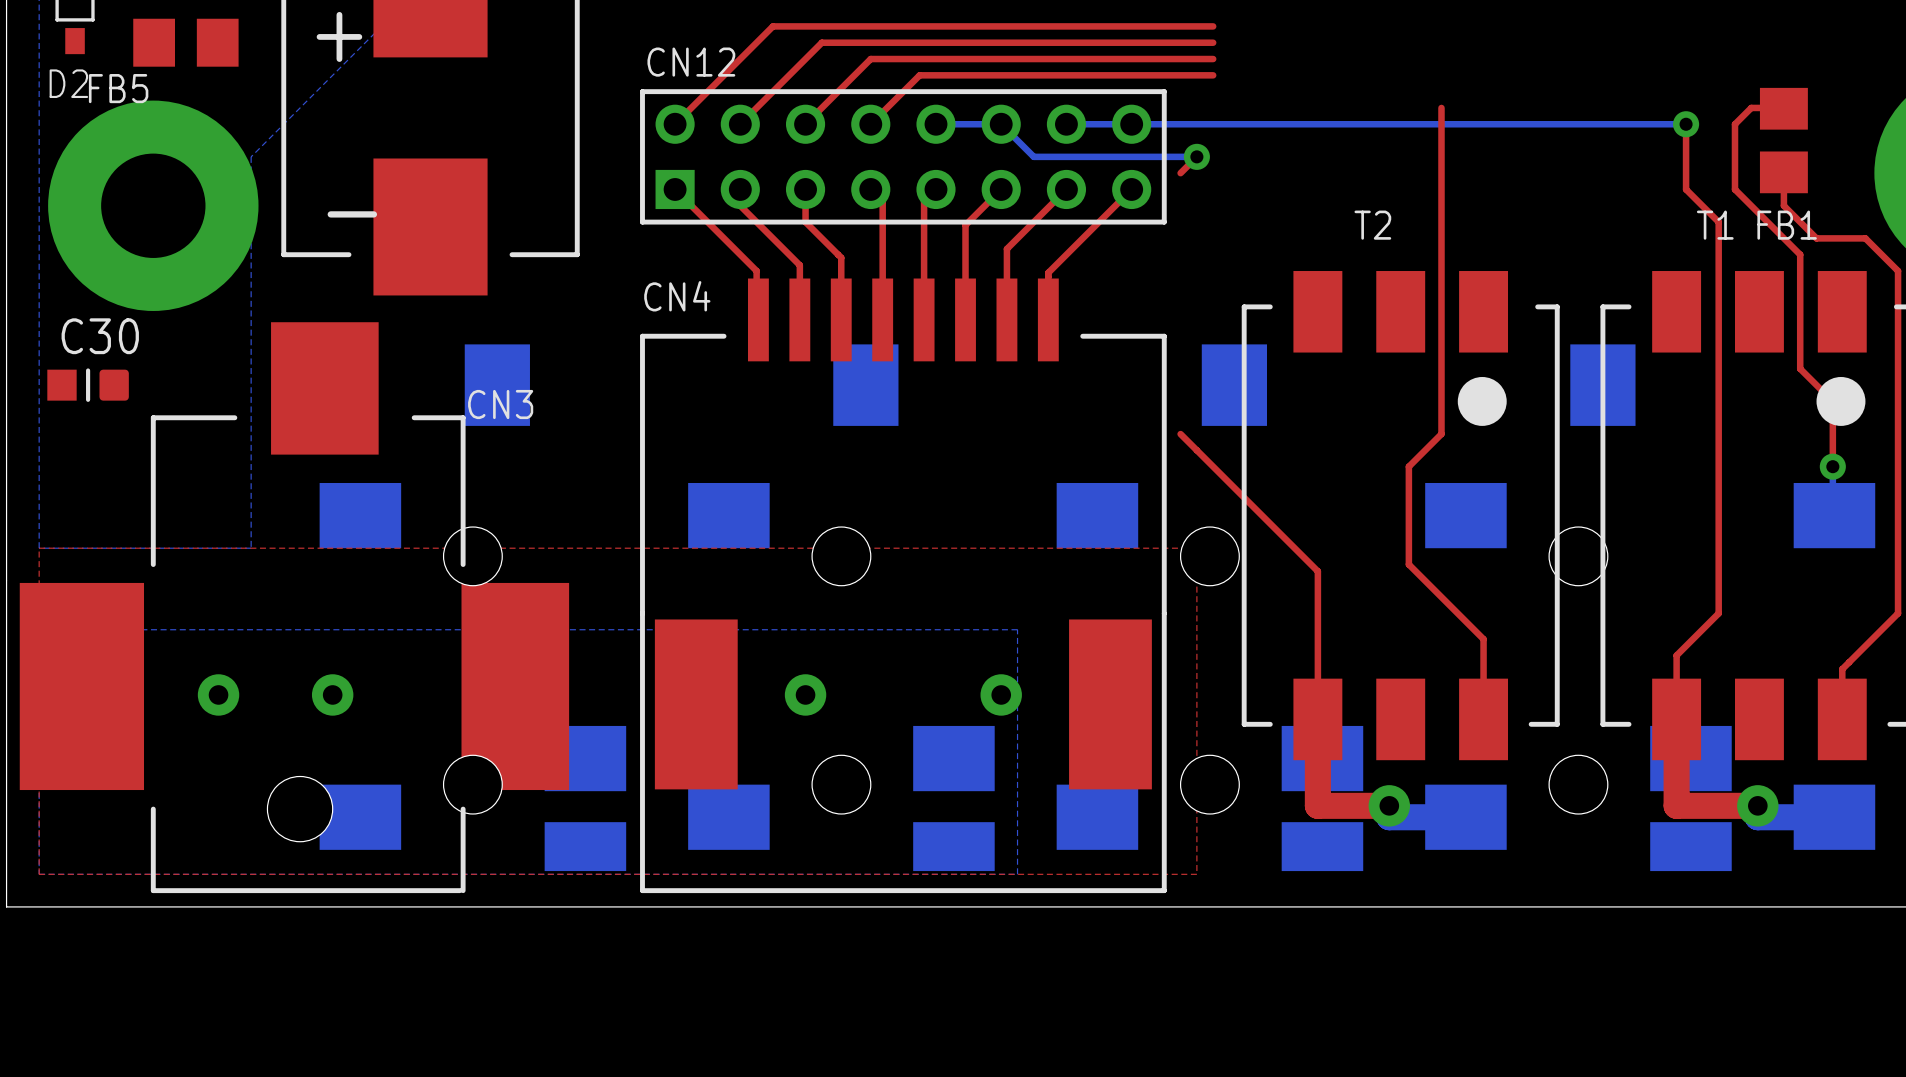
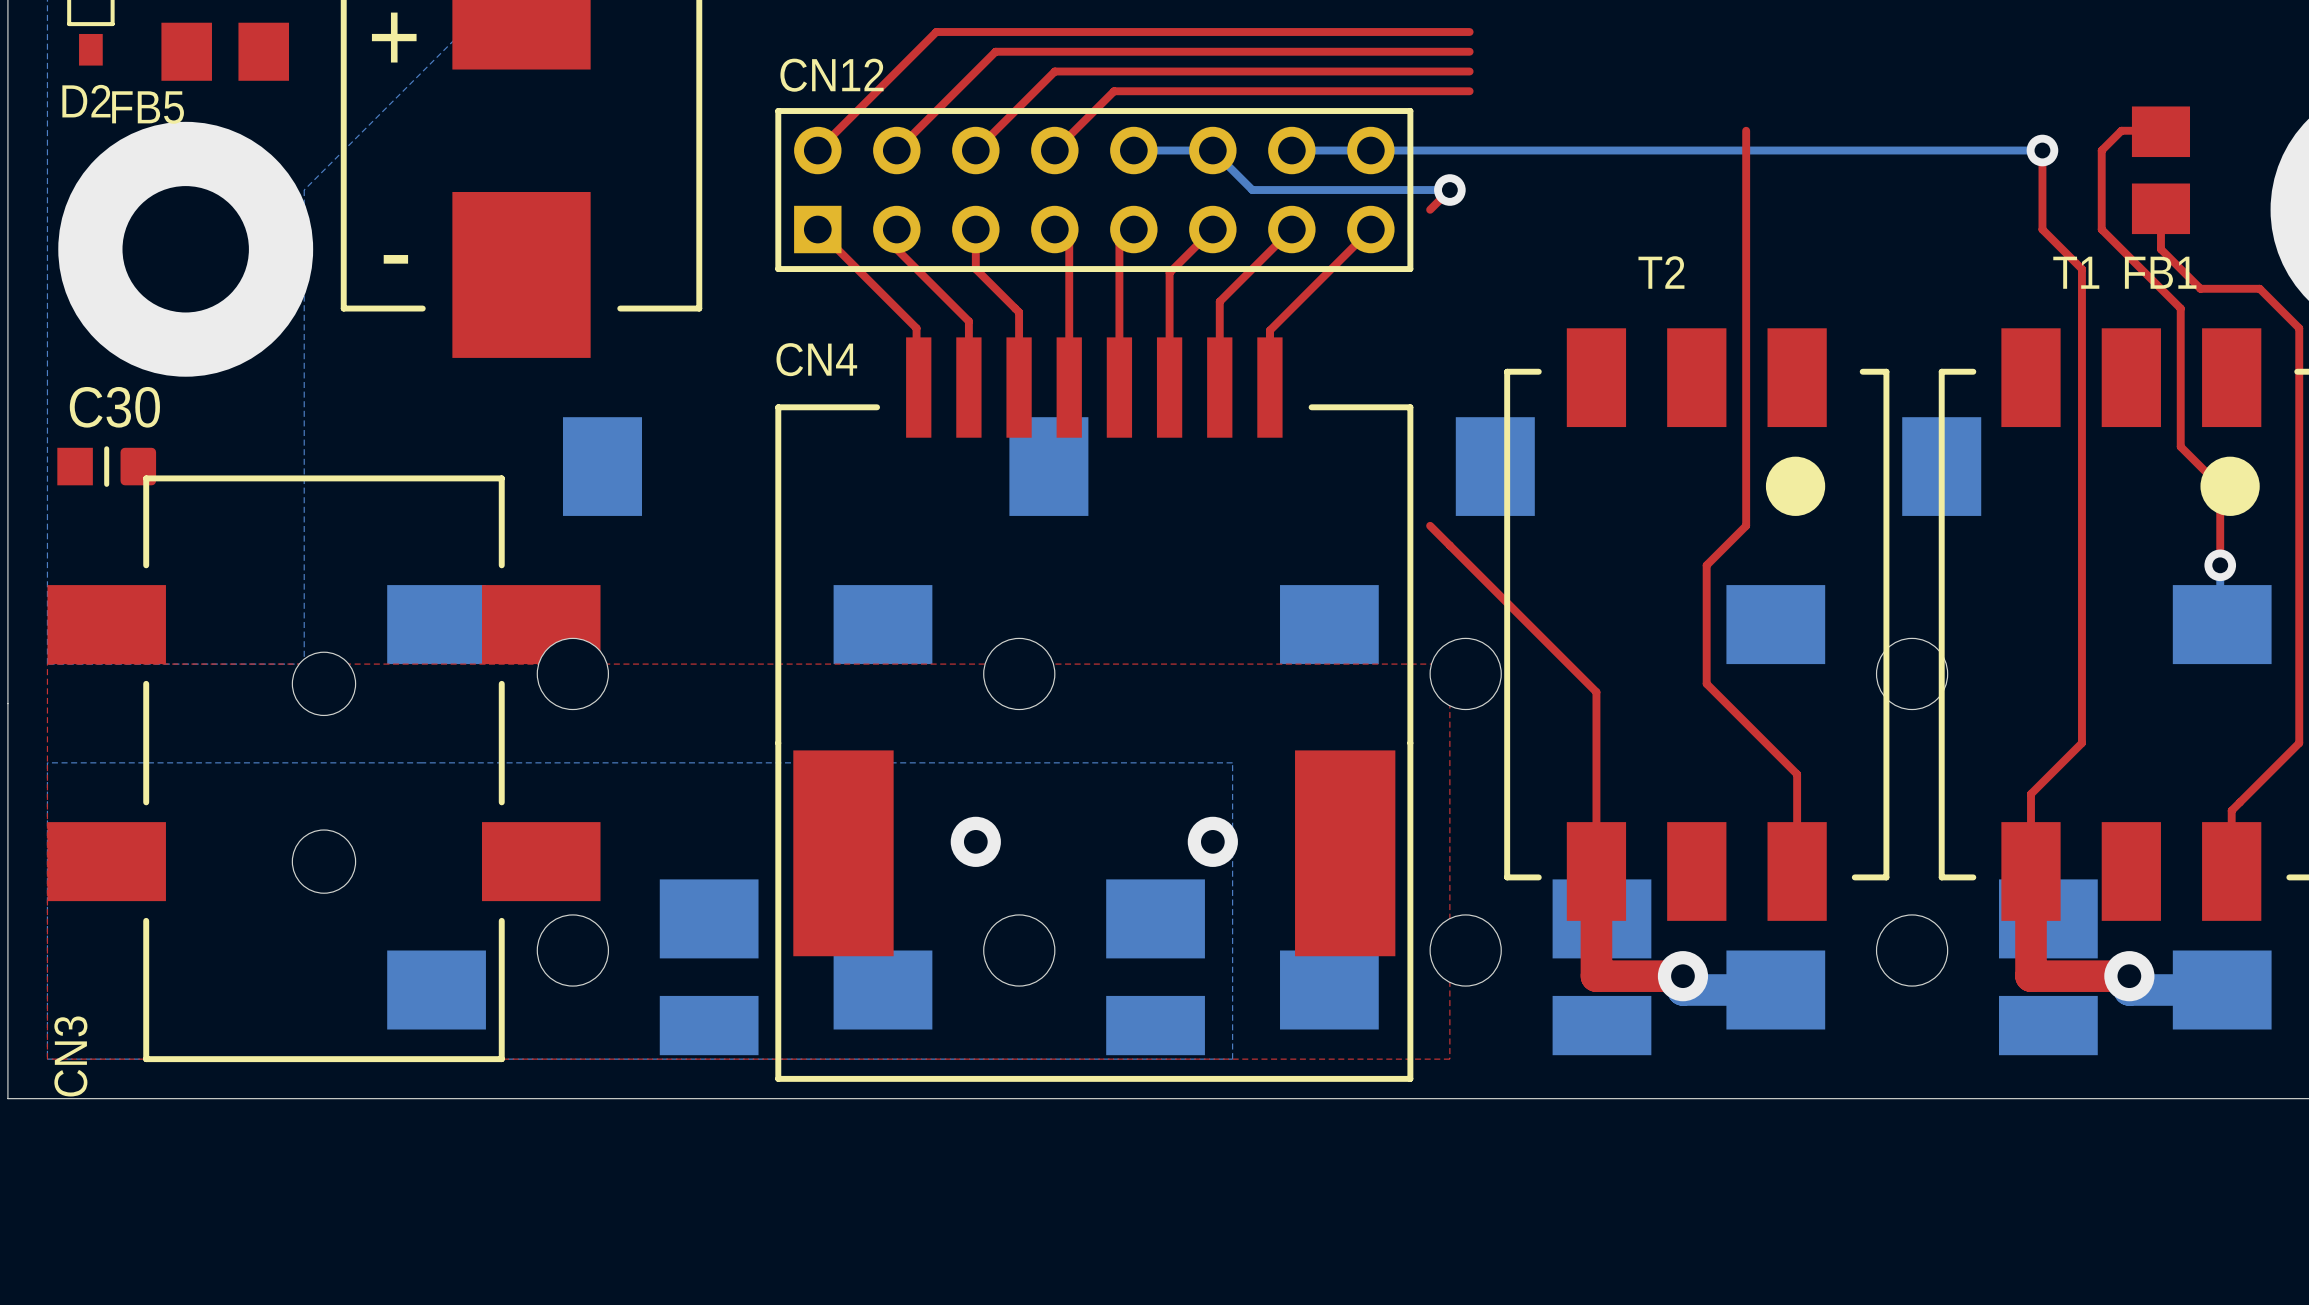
CN3 footprint: [19, 322, 570, 894] -> [47, 475, 601, 1063]
CN3 name position: CN3 (500, 404) -> CN3 (70, 1056)
via: (218, 694) -> none
via: (332, 694) -> none

